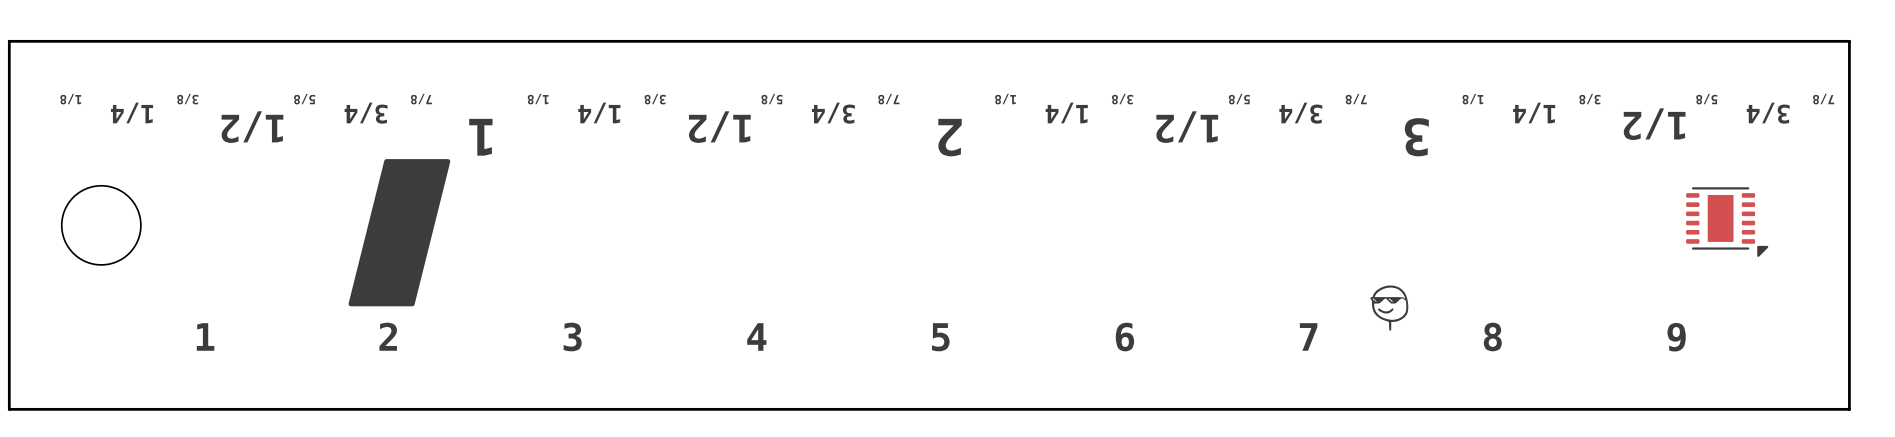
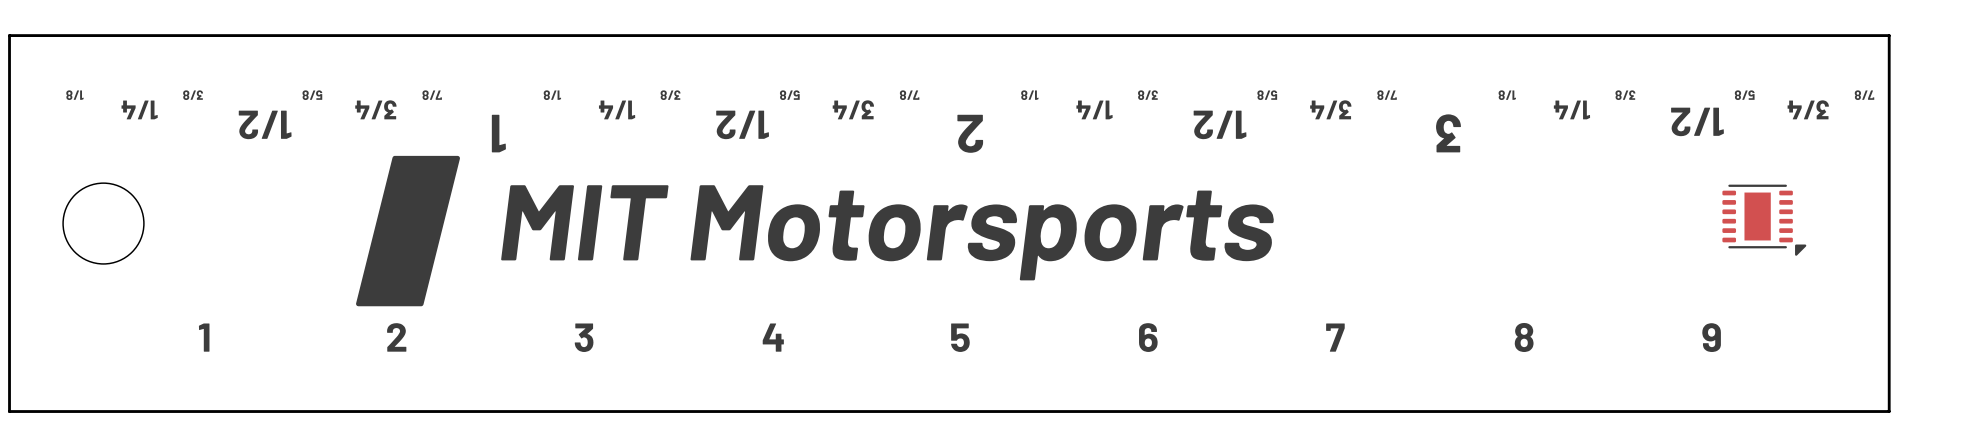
text: none -> MIT Motorsports (887, 232)
drawing: [1370, 285, 1409, 331] -> none

